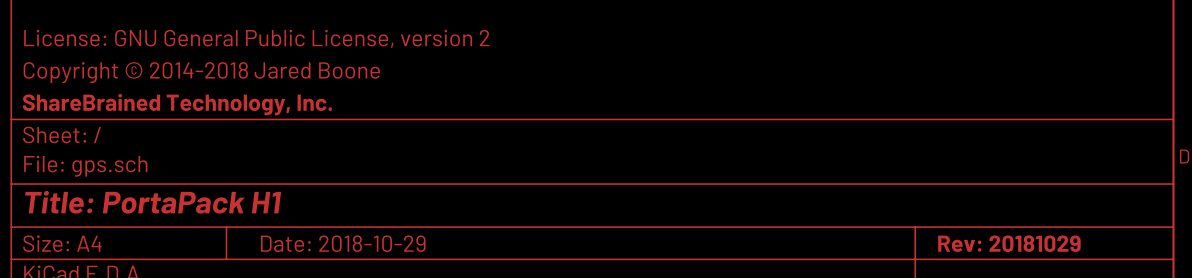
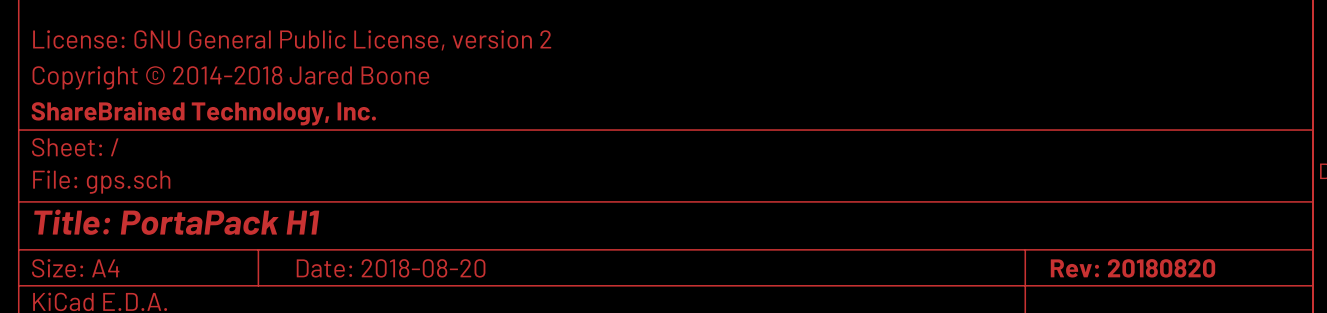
title block: Date: 2018-10-29 (343, 243) -> Date: 2018-08-20 (391, 268)
title block: Rev: 20181029 (1009, 243) -> Rev: 20180820 (1132, 268)

